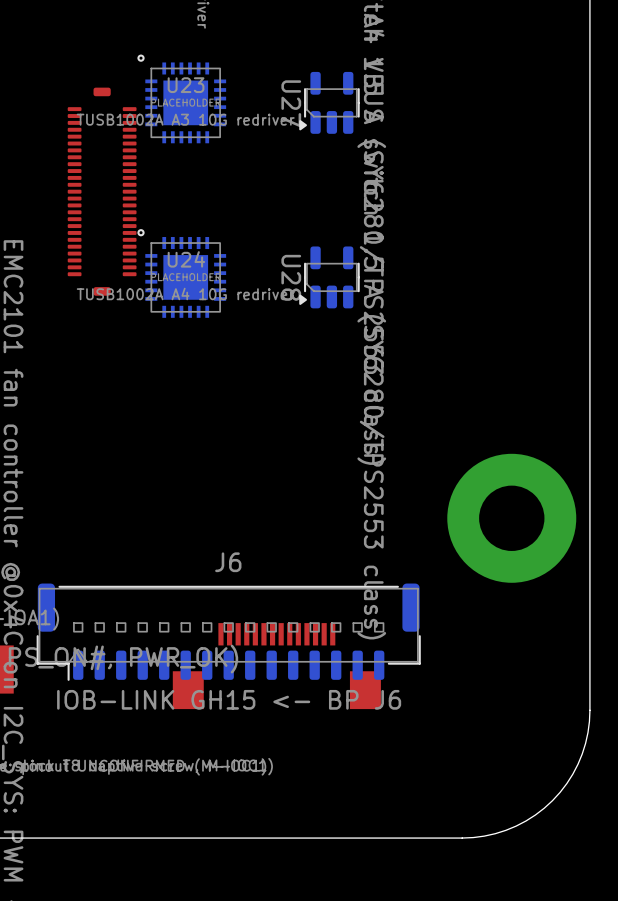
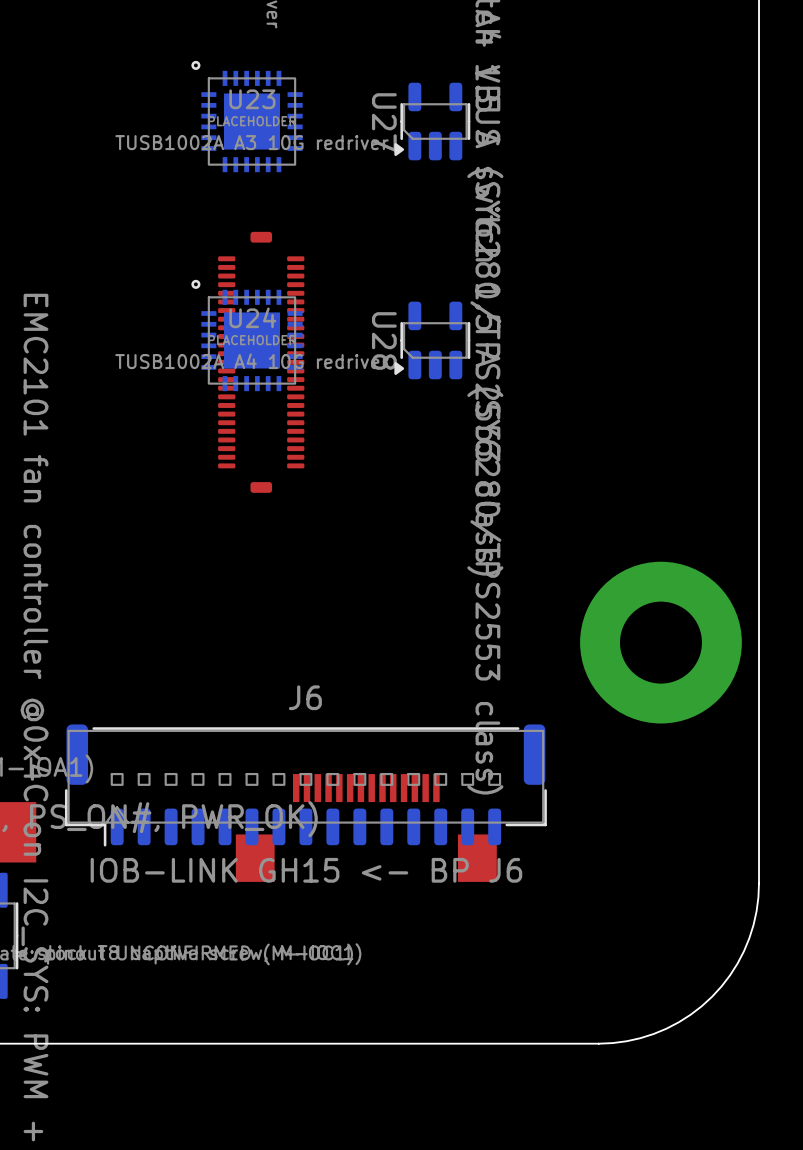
part position: (102, 191) -> (261, 362)

